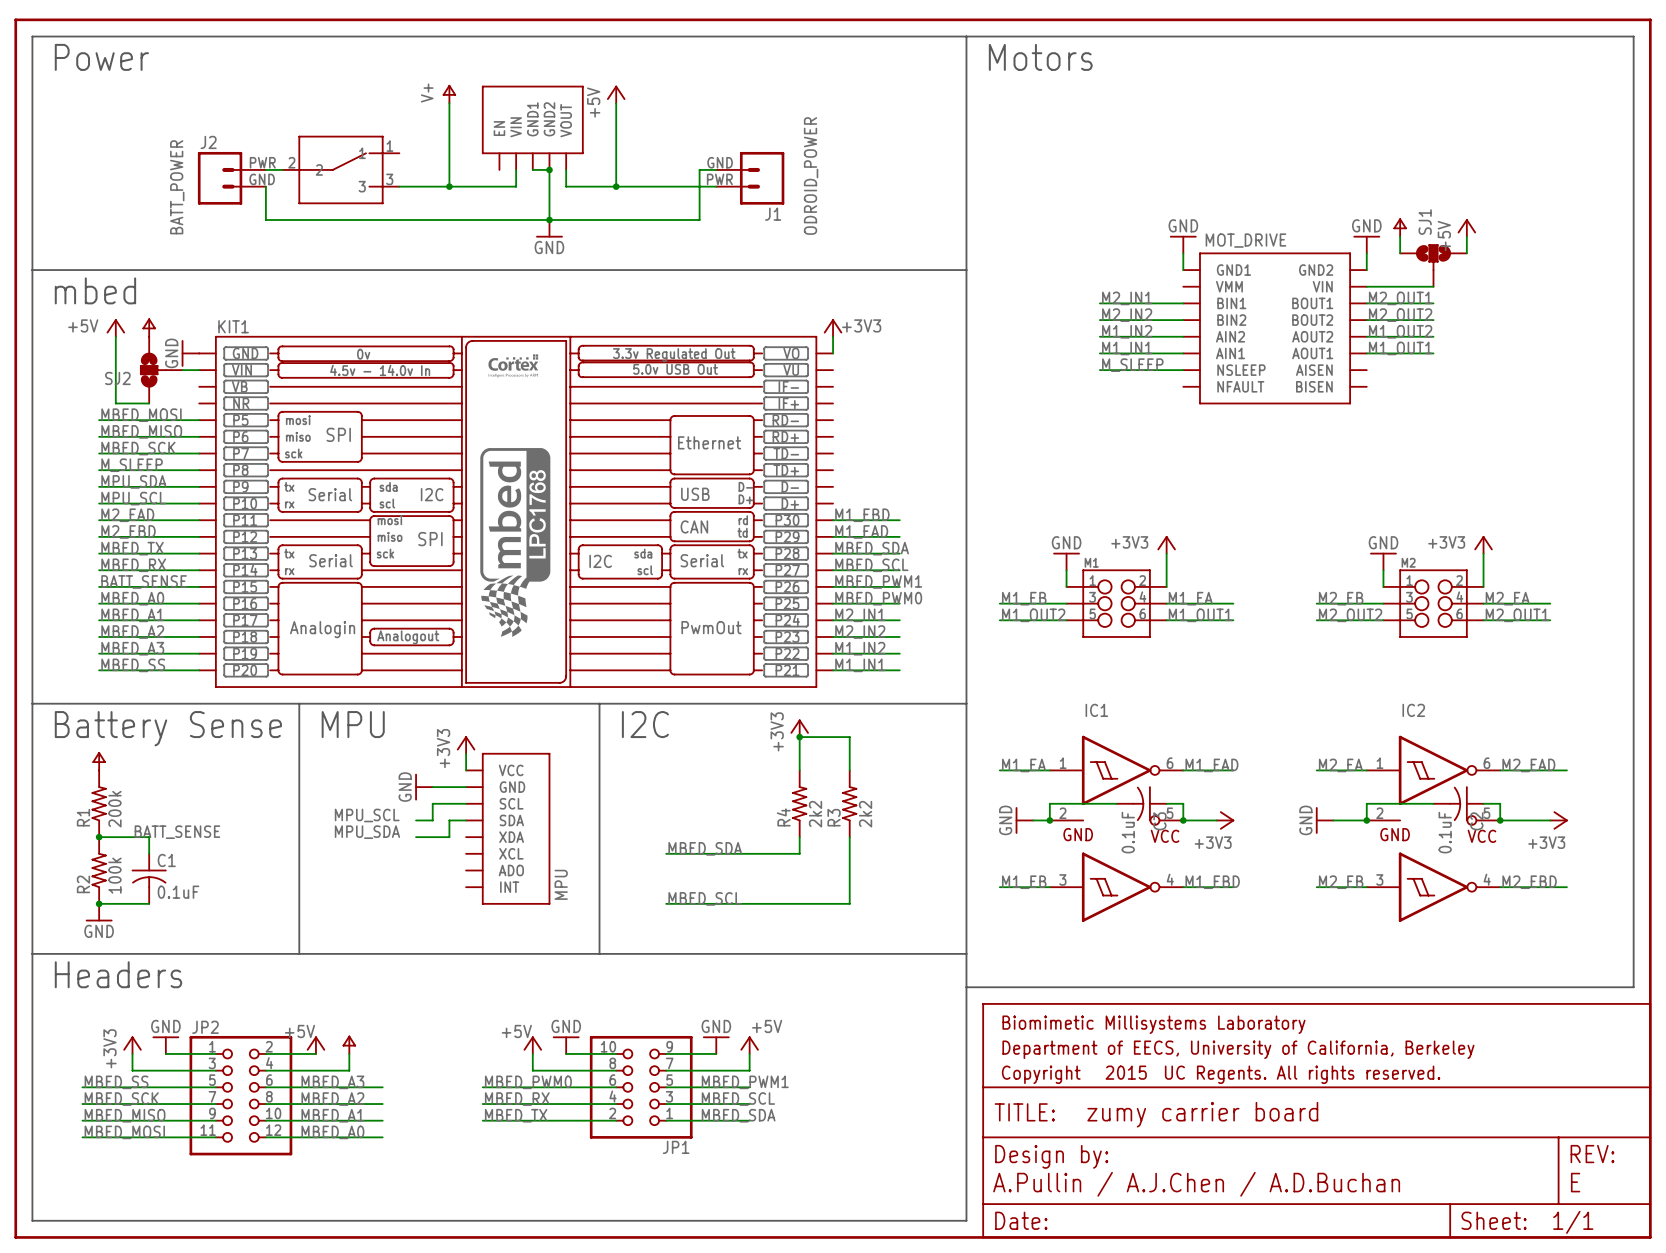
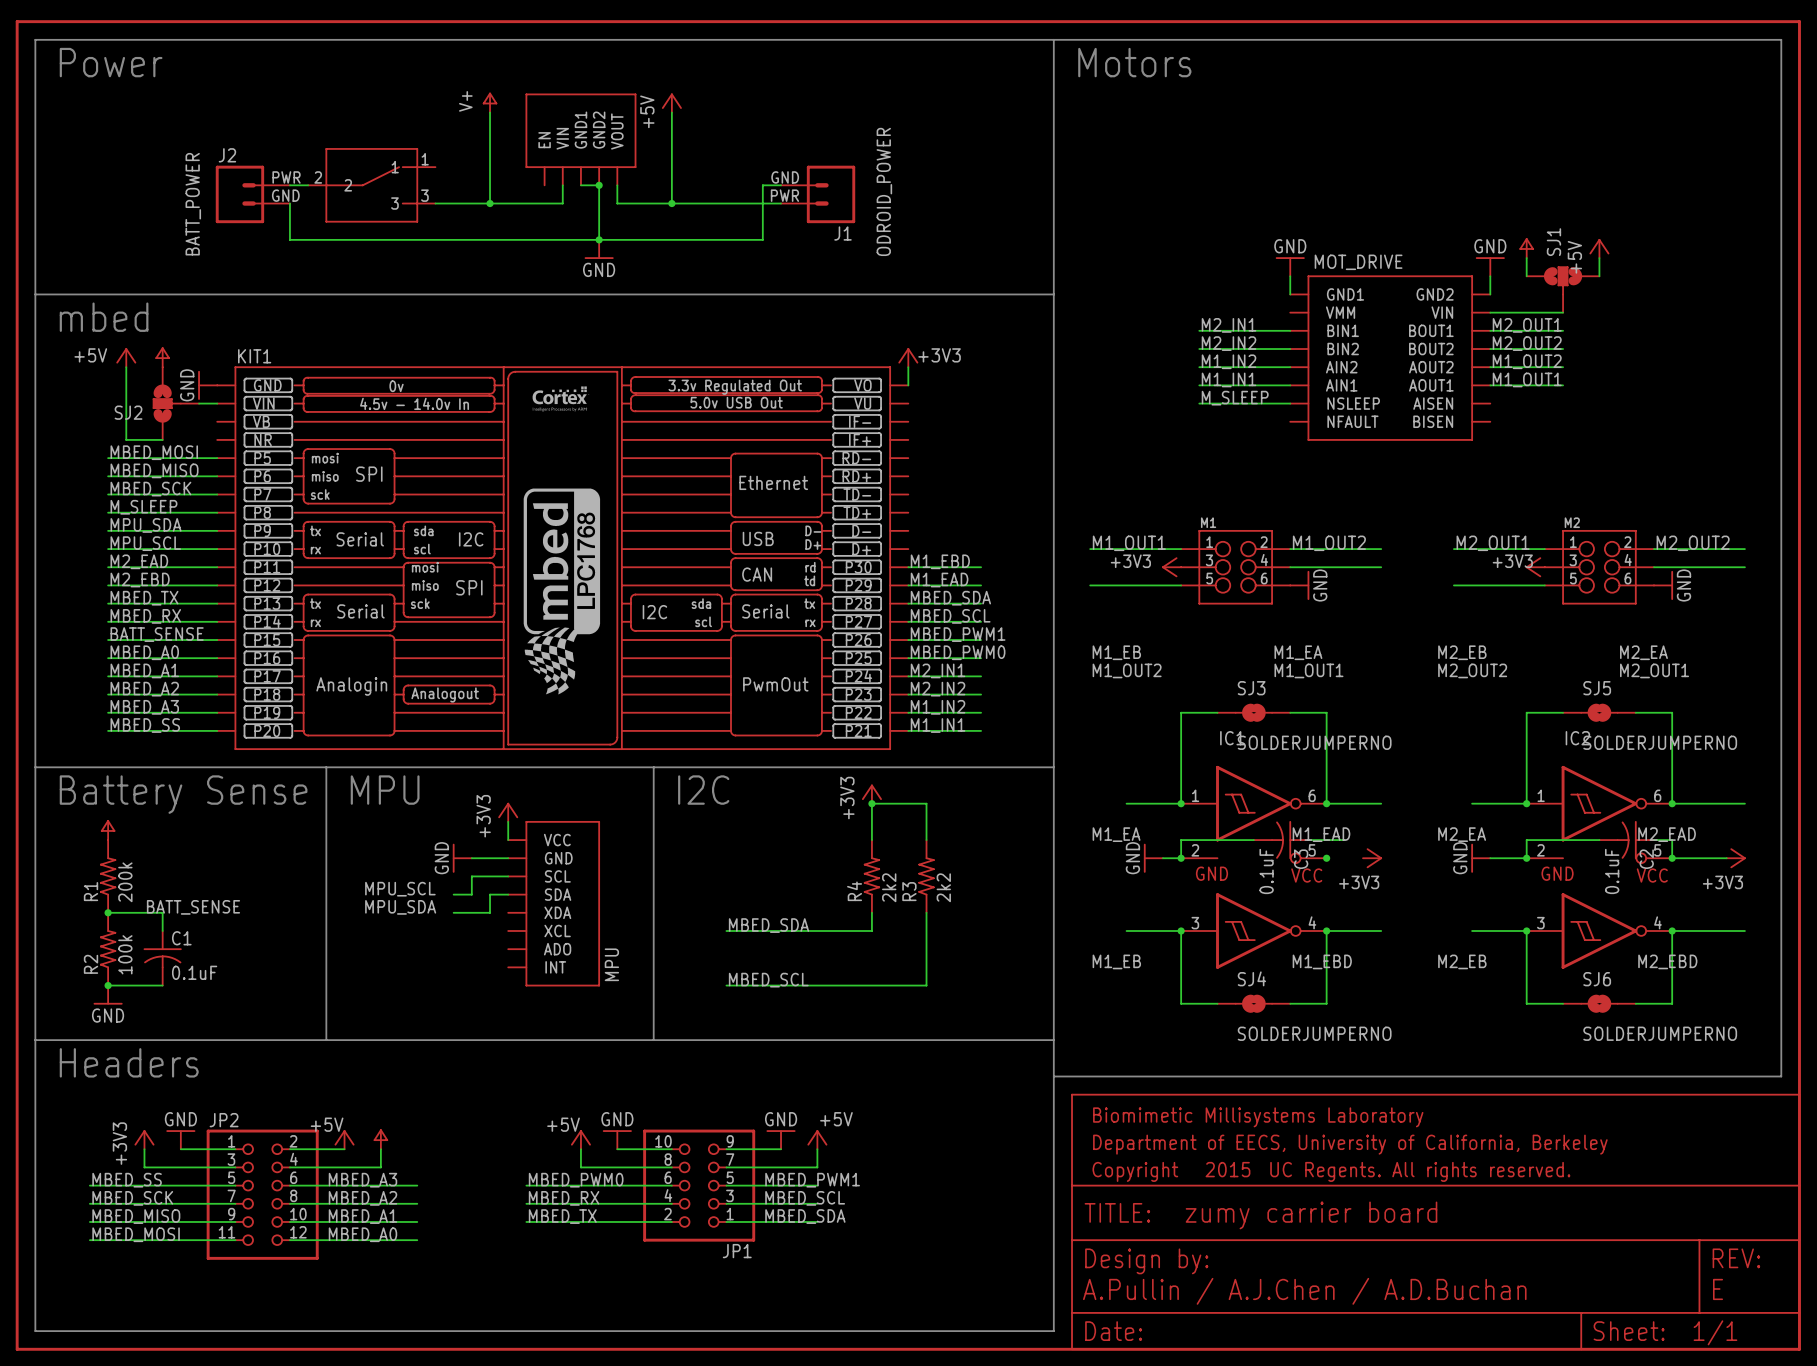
label: none -> M1_OUT1 (1129, 543)
label: none -> M1_OUT2 (1329, 543)
label: none -> M2_OUT1 (1493, 543)
label: none -> M2_OUT2 (1693, 543)
wire: none -> (1090, 549) (1181, 549)
wire: none -> (1290, 549) (1381, 549)
wire: none -> (1453, 549) (1544, 549)
wire: none -> (1653, 549) (1744, 549)
wire: none -> (1290, 567) (1381, 567)
wire: none -> (1653, 567) (1744, 567)
wire: none -> (1090, 585) (1181, 585)
power symbol: none -> GND (1299, 585)
wire: none -> (1453, 585) (1544, 585)
power symbol: none -> GND (1663, 585)
power symbol text position: +3V3 (1446, 542) -> +3V3 (1512, 561)
power symbol rotation: 0° (1166, 543) -> 90° counterclockwise (1169, 567)
power symbol rotation: 0° (1483, 543) -> 90° counterclockwise (1533, 567)
power symbol position: +3V3 (1166, 544) -> +3V3 (1171, 567)
power symbol position: +3V3 (1483, 544) -> +3V3 (1535, 567)
wire: (1166, 553) (1166, 586) -> none
wire: (1483, 553) (1483, 586) -> none
power symbol: GND (1066, 561) -> none
power symbol: GND (1383, 561) -> none
wire: (1066, 570) (1066, 586) -> none
wire: (1383, 570) (1383, 586) -> none
wire: (999, 603) (1066, 603) -> none
M1 position: (1116, 603) -> (1235, 567)
wire: (1166, 603) (1233, 603) -> none
wire: (1316, 603) (1383, 603) -> none
M2 position: (1433, 603) -> (1599, 567)
wire: (1483, 603) (1550, 603) -> none
wire: (999, 620) (1066, 620) -> none
wire: (1166, 620) (1233, 620) -> none
wire: (1316, 620) (1383, 620) -> none
wire: (1483, 620) (1550, 620) -> none
wire: none -> (1217, 712) (1181, 712) (1181, 803) (1126, 803)
SJ3: none -> SOLDERJUMPERNO (1253, 712)
wire: none -> (1290, 712) (1326, 712) (1326, 803) (1381, 803)
wire: none -> (1563, 712) (1526, 712) (1526, 803) (1472, 803)
SJ5: none -> SOLDERJUMPERNO (1599, 712)
wire: none -> (1635, 712) (1672, 712) (1672, 803) (1744, 803)
junction: none -> (1181, 803)
junction: none -> (1326, 803)
junction: none -> (1526, 803)
junction: none -> (1672, 803)
wire: (999, 770) (1049, 770) -> none
wire: (1316, 770) (1366, 770) -> none
wire: (1533, 770) (1566, 770) -> (1672, 840) (1672, 858) (1726, 858)
junction: none -> (1181, 858)
junction: none -> (1326, 858)
junction: none -> (1526, 858)
junction: none -> (1672, 858)
wire: (1116, 803) (1049, 803) (1049, 820) (1033, 820) -> (1253, 840) (1181, 840) (1181, 858) (1162, 858)
C3 position: (1141, 803) -> (1281, 840)
wire: (1166, 803) (1183, 803) (1183, 820) (1216, 820) -> none
wire: (1433, 803) (1366, 803) (1366, 820) (1333, 820) -> (1599, 840) (1526, 840) (1526, 858) (1490, 858)
C2 position: (1458, 803) -> (1626, 840)
wire: (1483, 803) (1500, 803) (1500, 820) (1550, 820) -> none
power symbol position: GND (1024, 820) -> GND (1153, 858)
junction: (1049, 820) -> none
junction: (1183, 820) -> none
power symbol position: +3V3 (1225, 820) -> +3V3 (1372, 858)
power symbol position: GND (1324, 820) -> GND (1480, 858)
junction: (1366, 820) -> none
junction: (1500, 820) -> none
power symbol position: +3V3 (1559, 820) -> +3V3 (1736, 858)
IC1 position: (1116, 828) -> (1253, 867)
IC2 position: (1433, 828) -> (1599, 867)
wire: none -> (1126, 930) (1181, 930) (1181, 1003) (1217, 1003)
junction: none -> (1181, 930)
junction: none -> (1326, 930)
wire: none -> (1381, 930) (1326, 930) (1326, 1003) (1290, 1003)
wire: none -> (1472, 930) (1526, 930) (1526, 1003) (1563, 1003)
junction: none -> (1526, 930)
junction: none -> (1672, 930)
wire: none -> (1744, 930) (1672, 930) (1672, 1003) (1635, 1003)
wire: (999, 887) (1049, 887) -> none
wire: (1183, 887) (1233, 887) -> none
wire: (1316, 887) (1366, 887) -> none
wire: (1500, 887) (1566, 887) -> none
SJ4: none -> SOLDERJUMPERNO (1253, 1003)
SJ6: none -> SOLDERJUMPERNO (1599, 1003)

